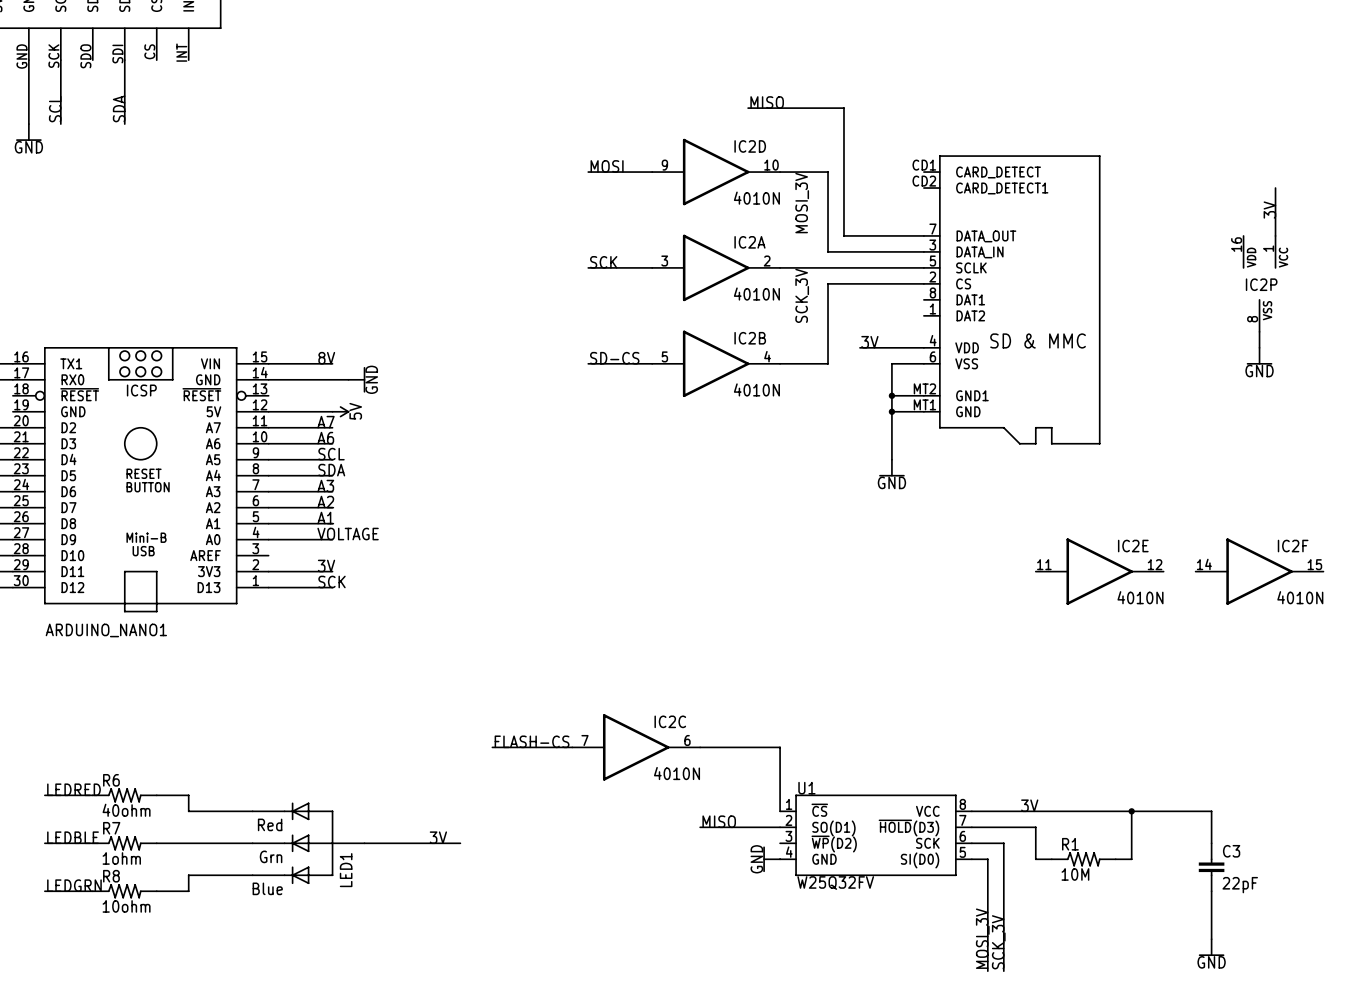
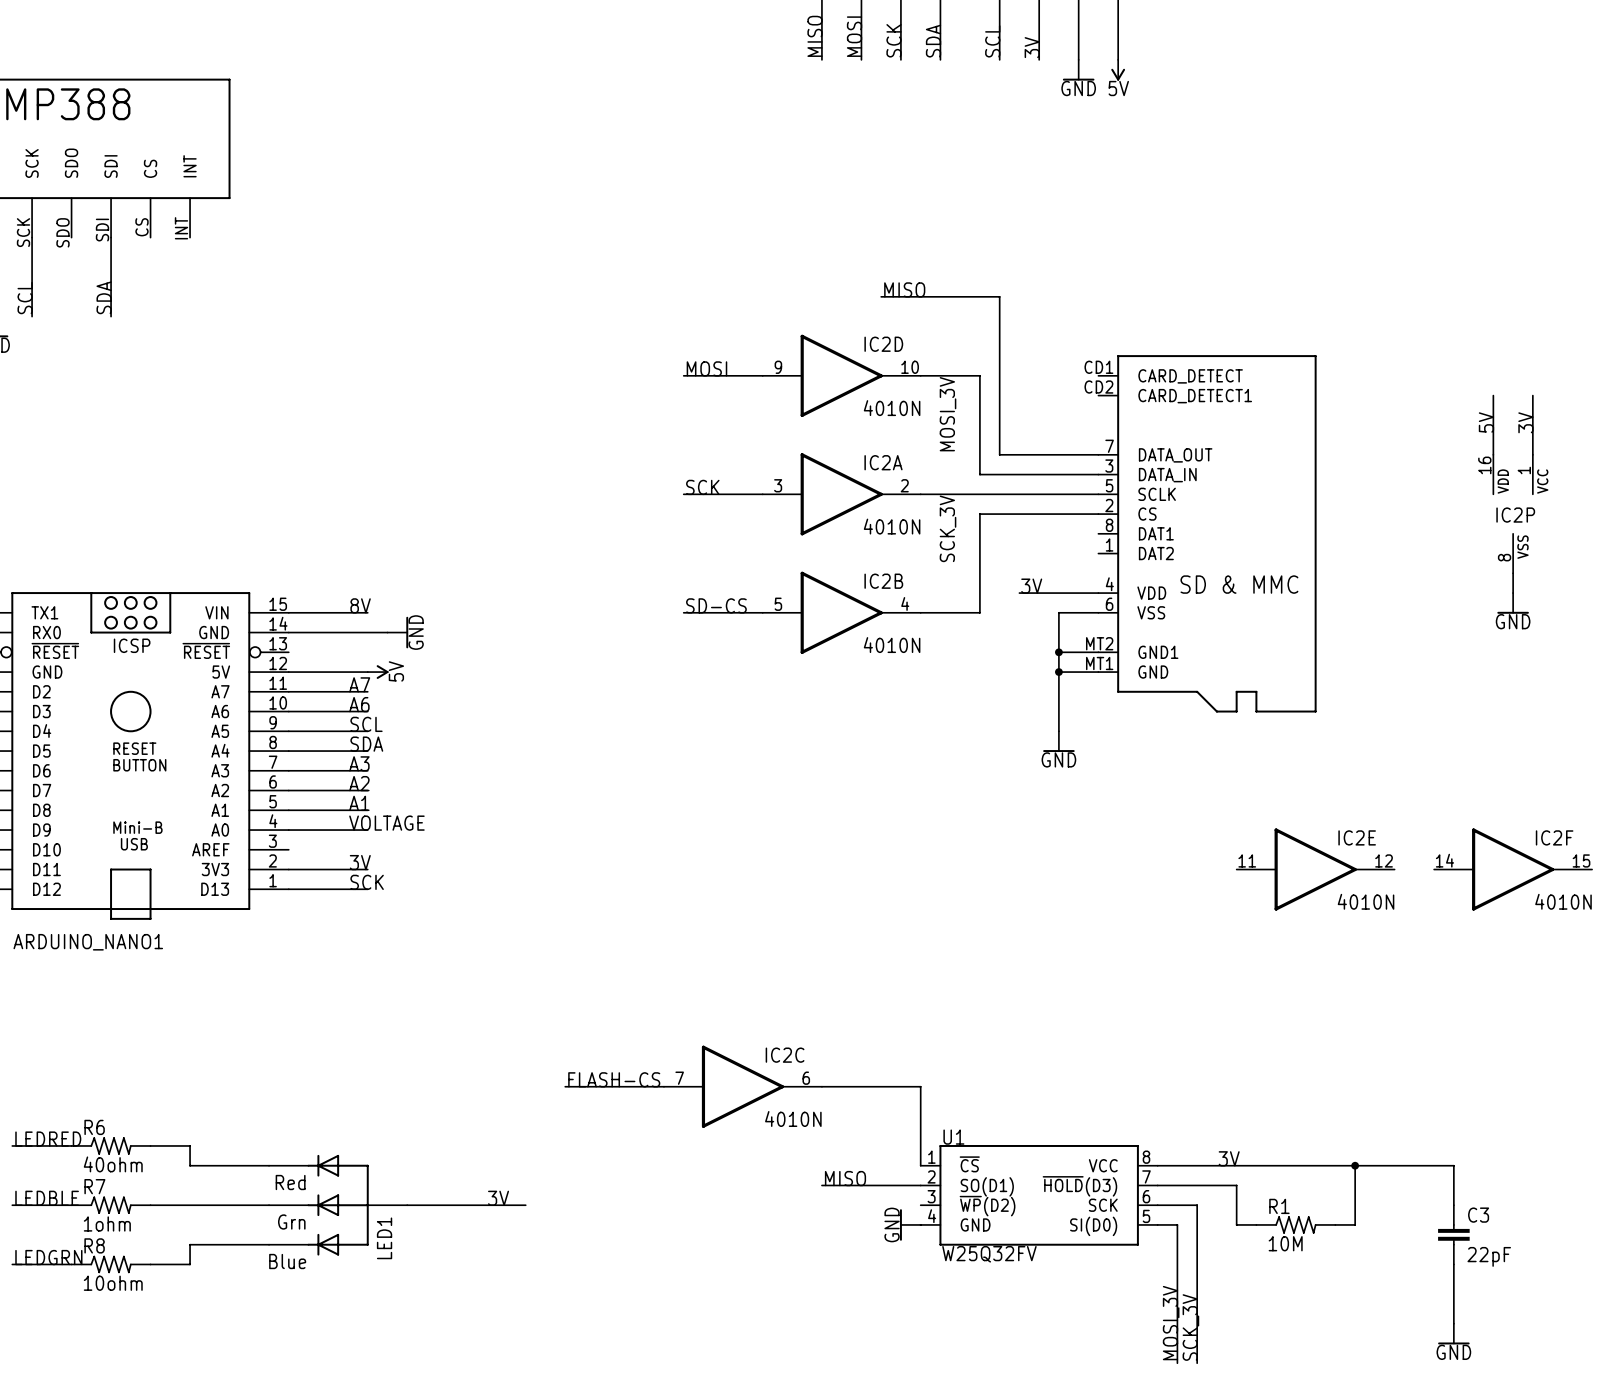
wire: none -> (1493, 395) (1493, 454)
label: none -> 5V (1486, 422)

